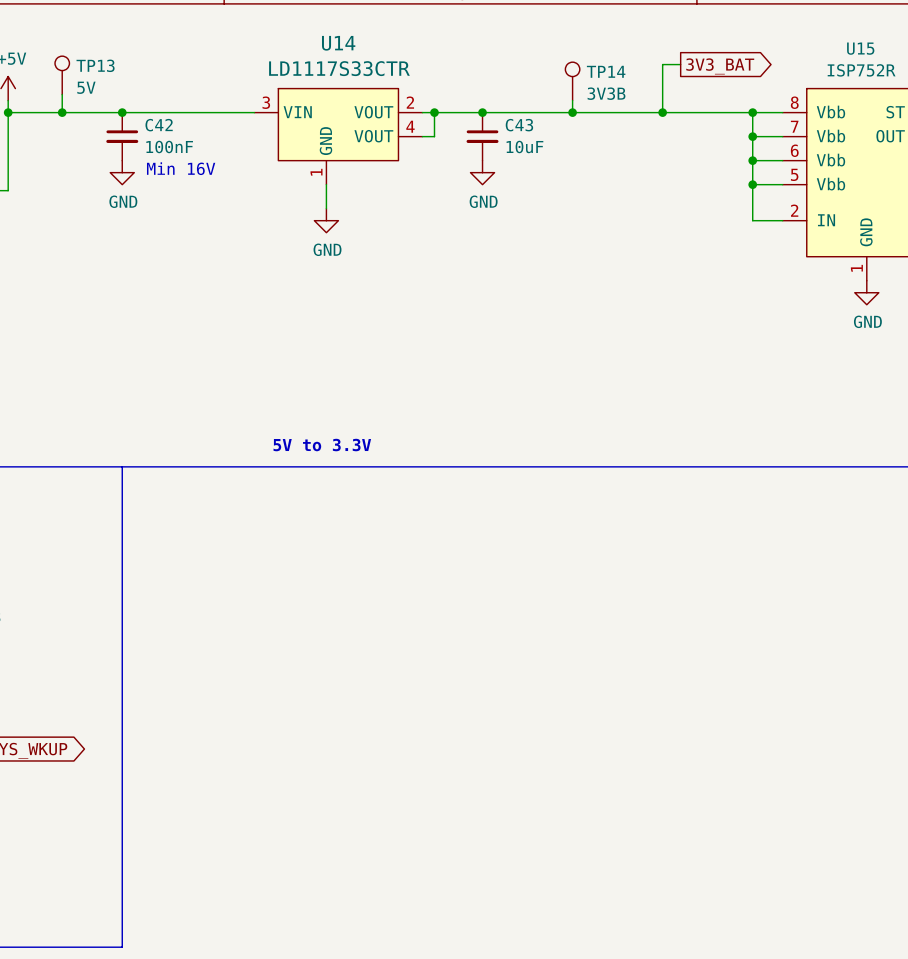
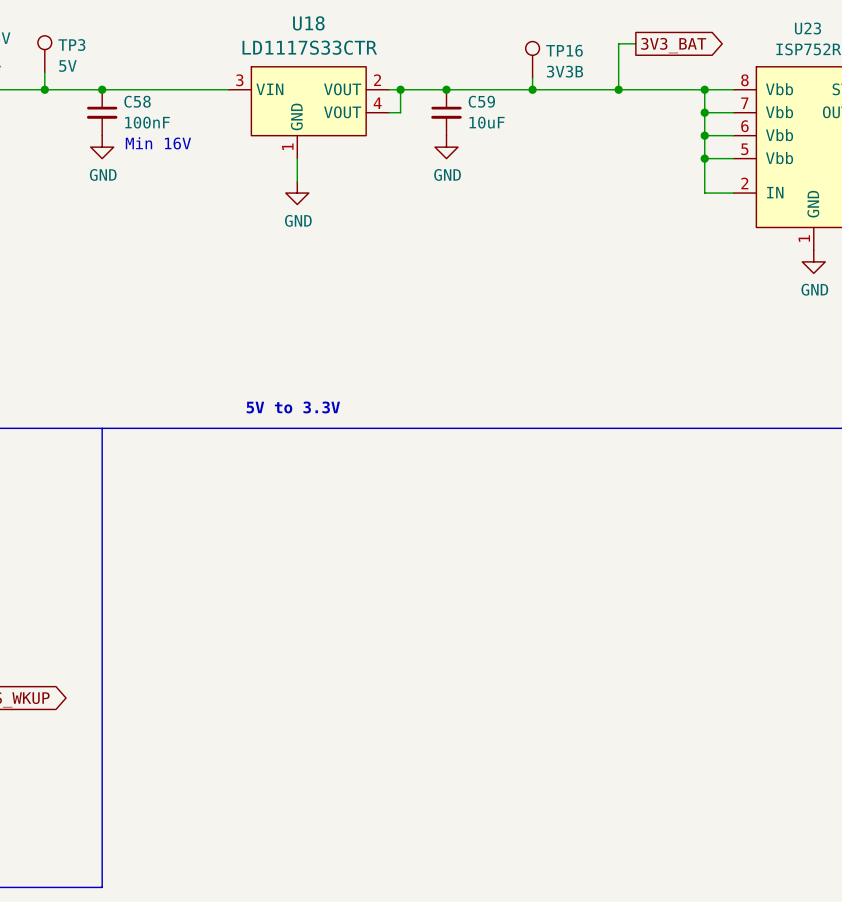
U14 name: U14 (338, 43) -> U18 (308, 23)
U15 name: U15 (860, 48) -> U23 (808, 28)
TP13 name: TP13 (95, 65) -> TP3 (71, 45)
TP14 name: TP14 (606, 71) -> TP16 (564, 50)
C42 name: C42 (159, 125) -> C58 (137, 101)
C43 name: C43 (519, 125) -> C59 (481, 101)

